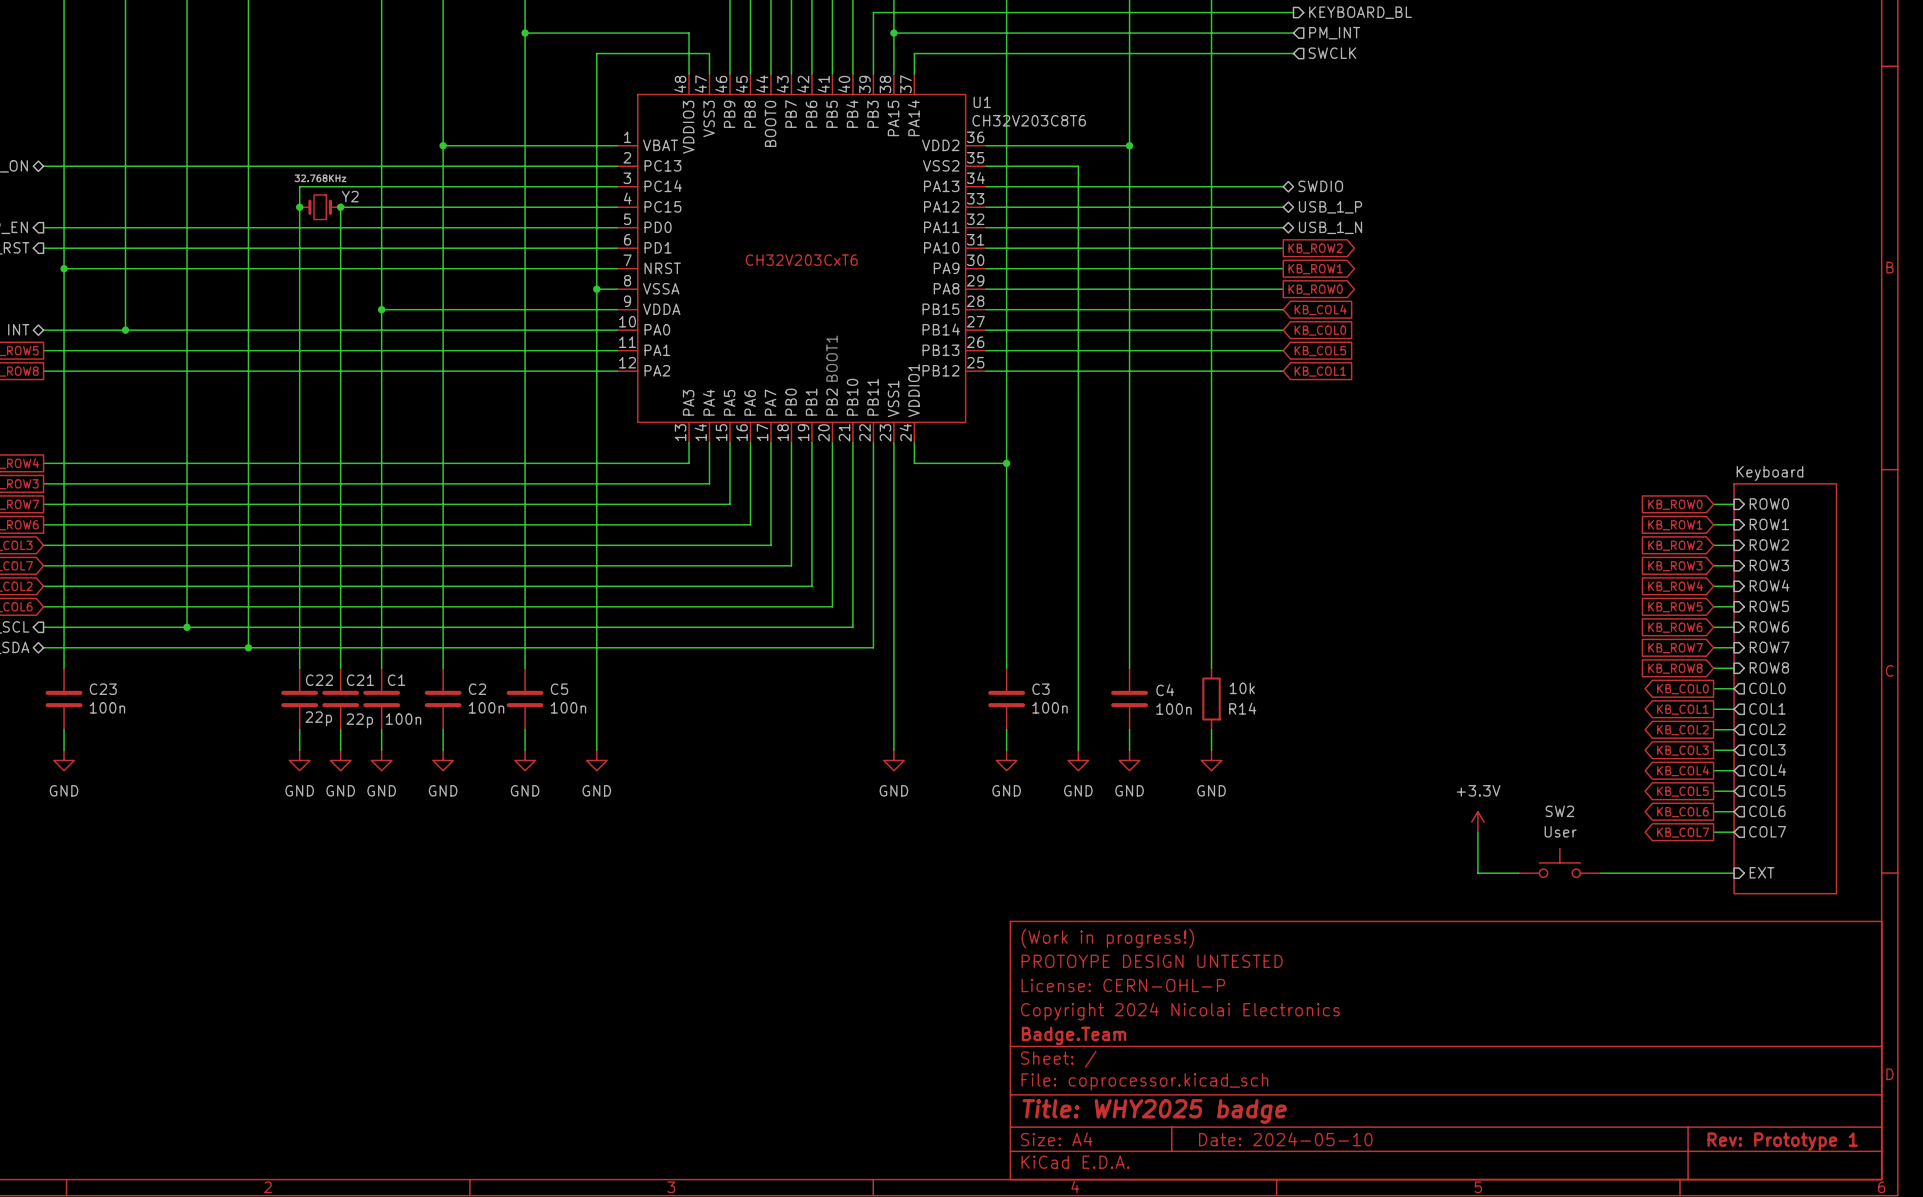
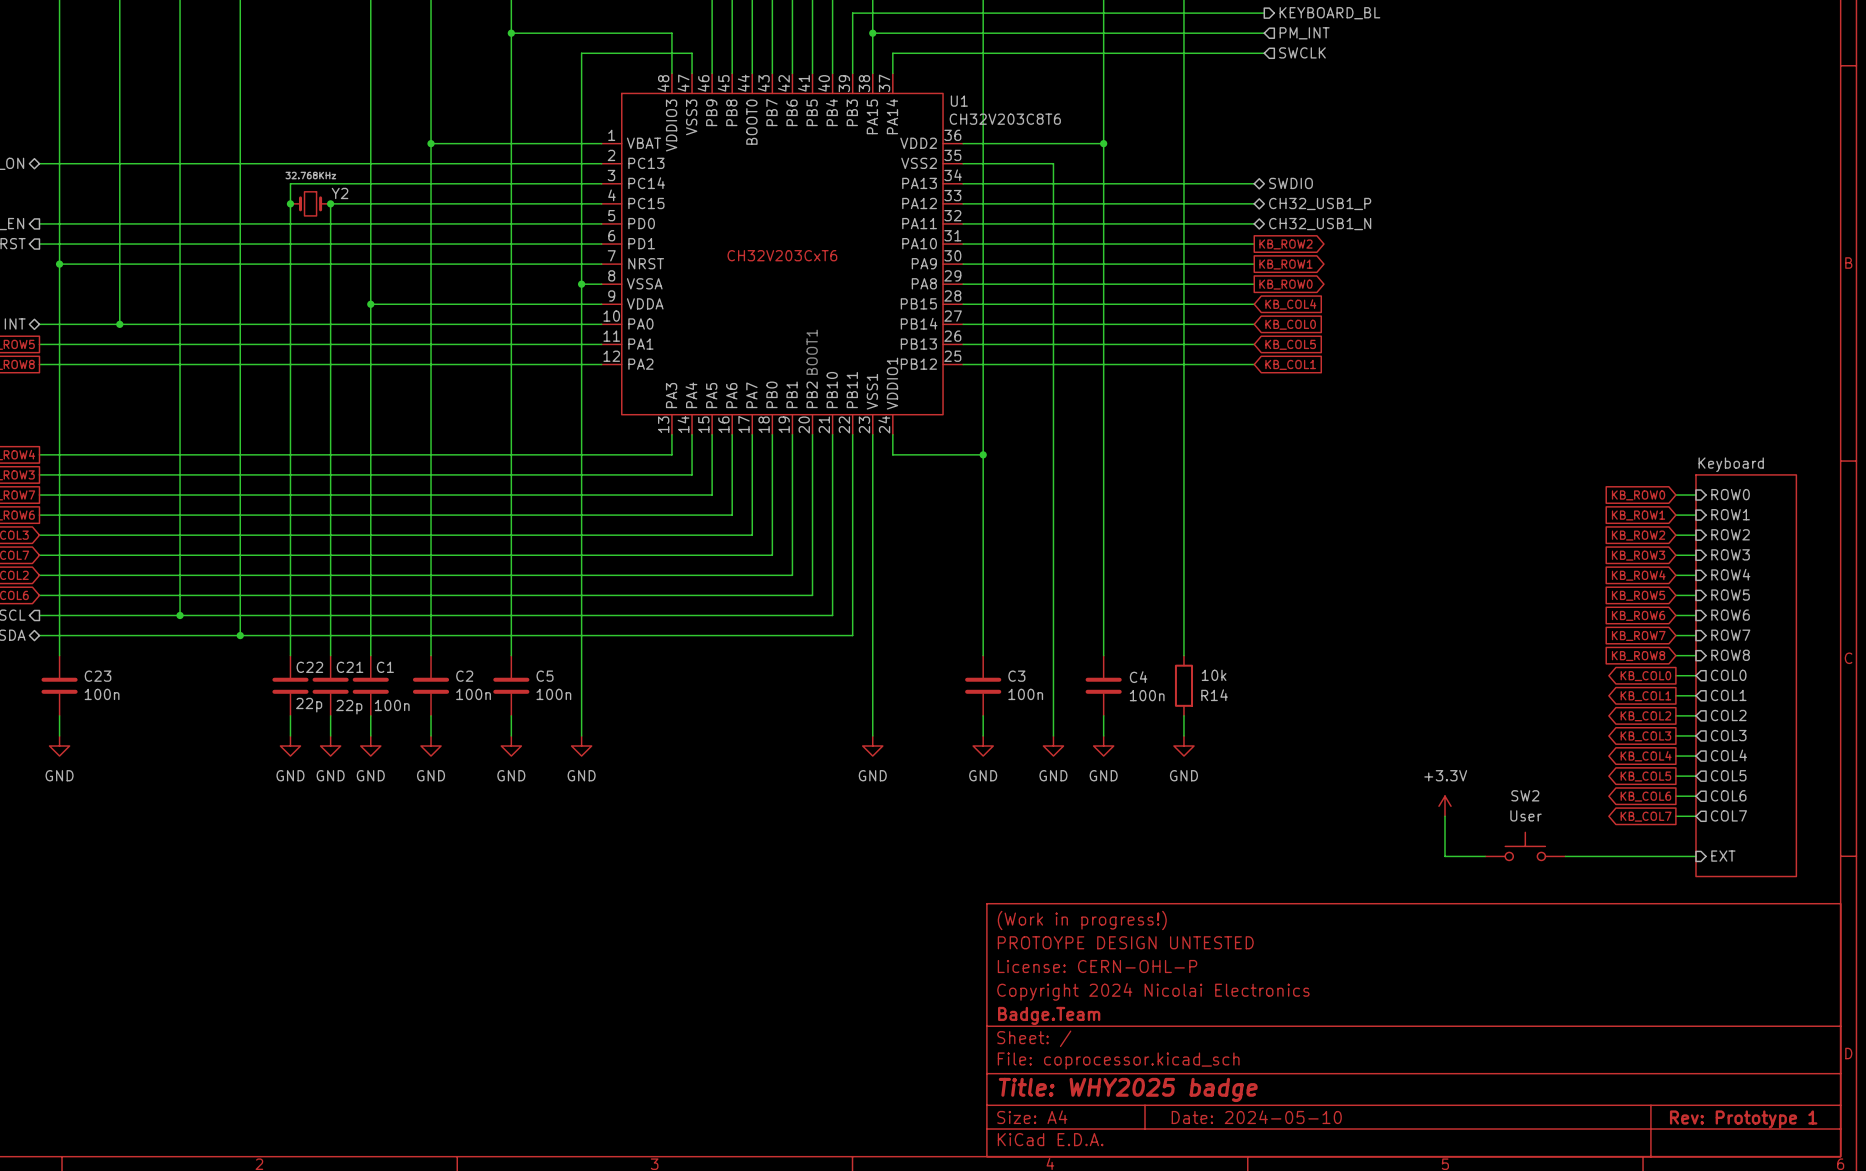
hierarchical label: USB_1_P (1330, 207) -> CH32_USB1_P (1320, 203)
hierarchical label: USB_1_N (1330, 227) -> CH32_USB1_N (1320, 224)

